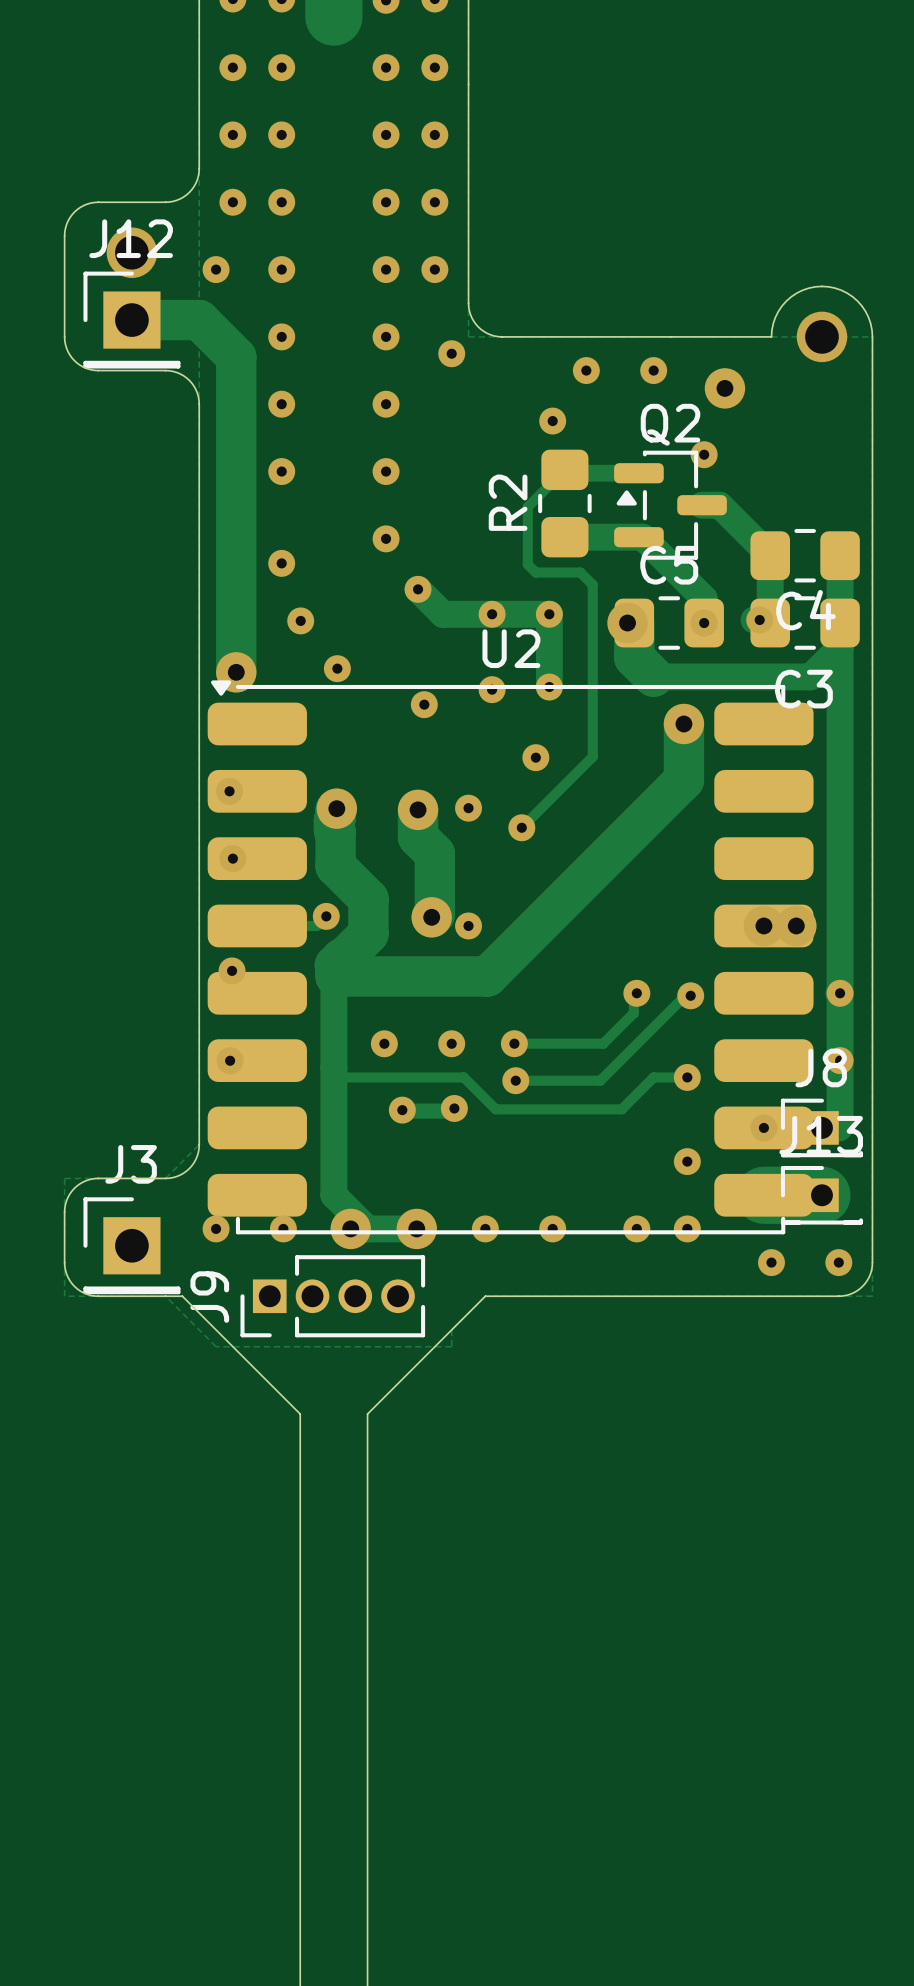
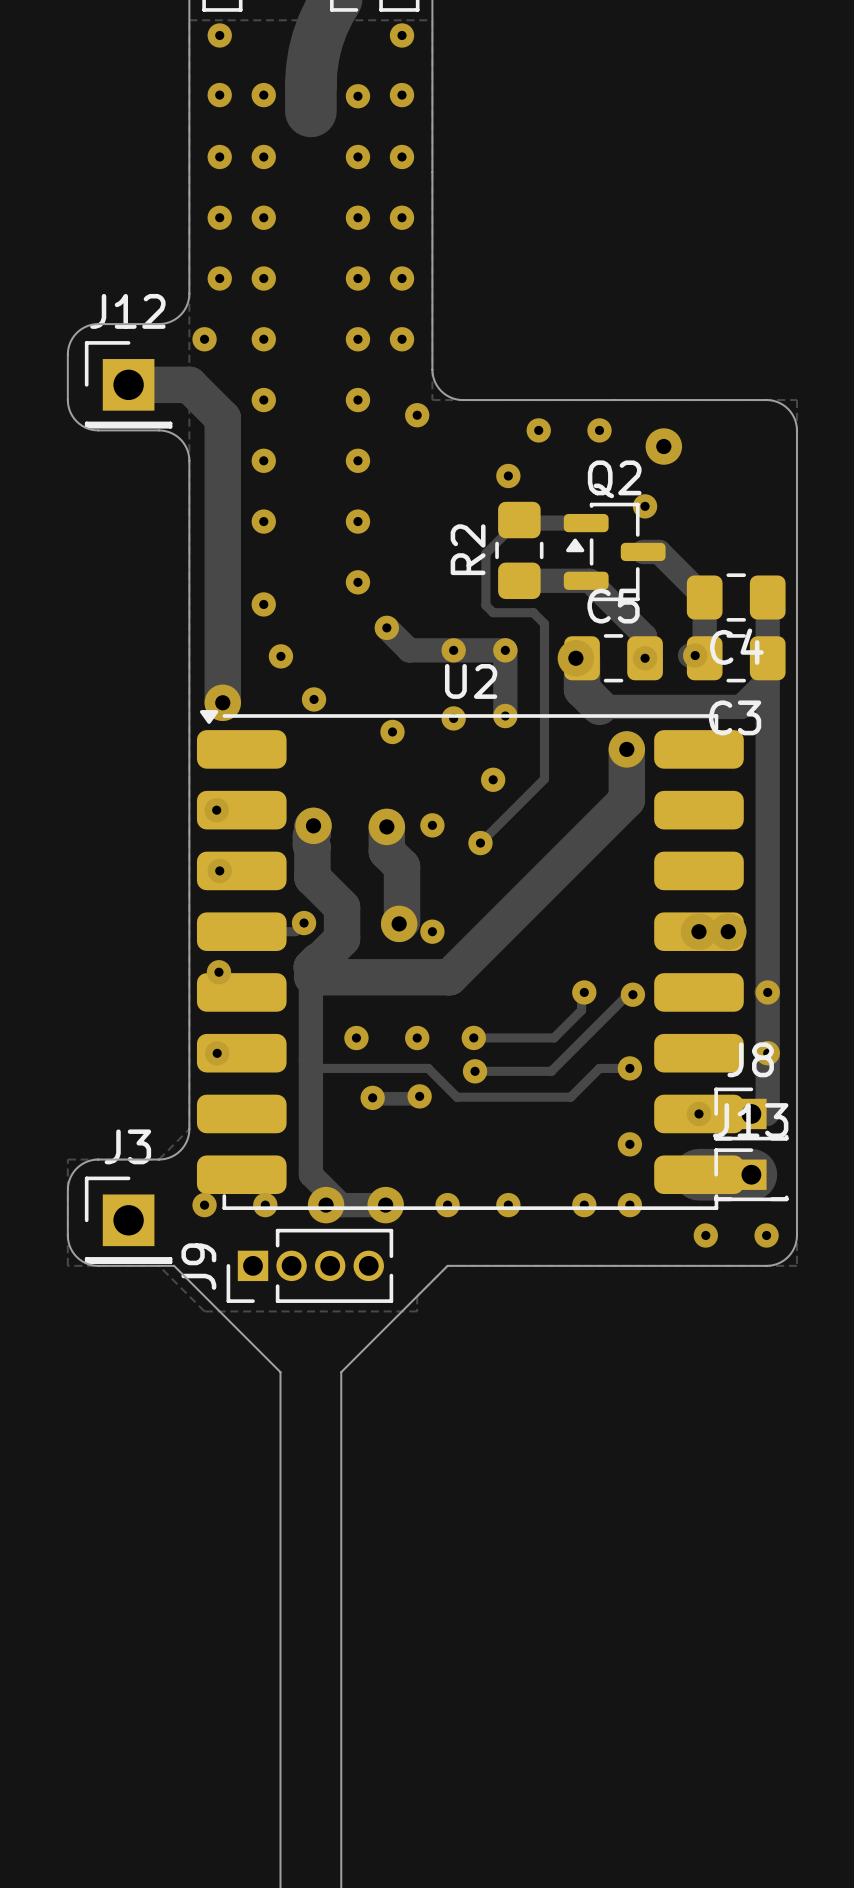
board edge: (199, 168) (194, 186) (186, 194) (176, 200) (165, 202) (94, 202) (77, 209) (69, 218) (64, 232) (64, 286) -> (189, 248) (189, 297) (184, 309) (177, 317) (162, 323) (88, 325) (79, 330) (72, 338) (67, 354)
via: (131, 252) -> none
board edge: (771, 336) (773, 323) (778, 311) (791, 296) (802, 290) (815, 286) (835, 288) (847, 293) (857, 301) (868, 317) (872, 330) (872, 370) -> (705, 400) (776, 401) (785, 406) (792, 414) (796, 430)
via: (821, 336) -> none

